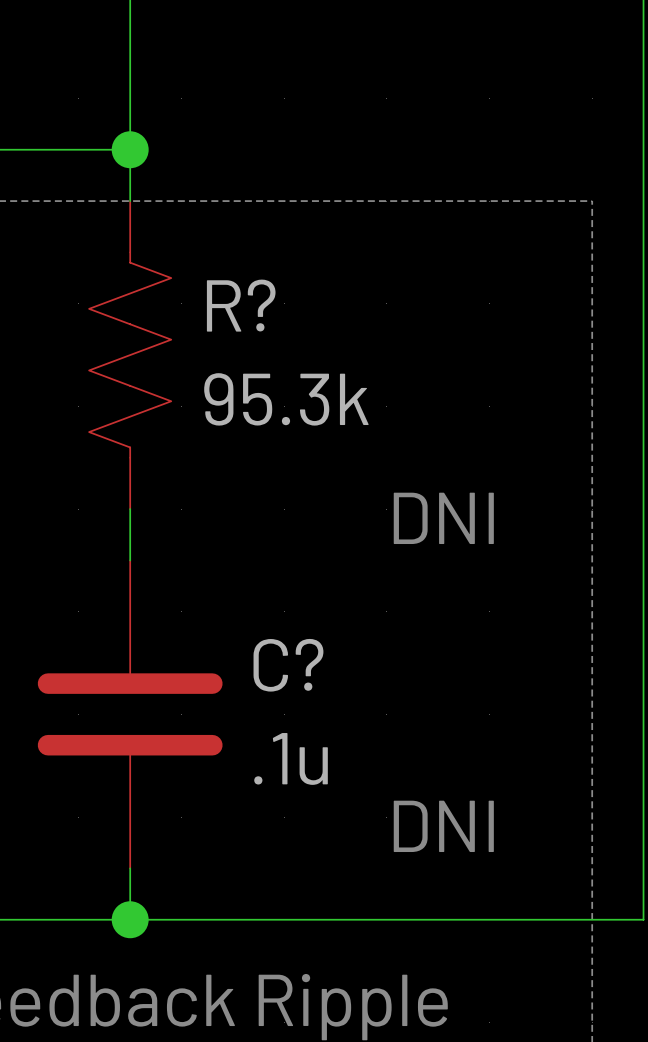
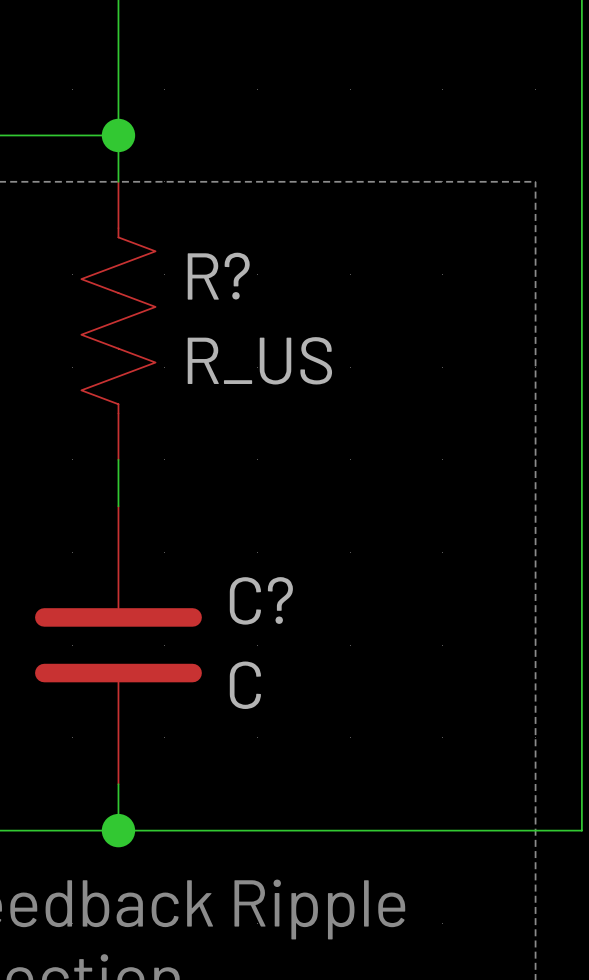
R? value: 95.3k (286, 399) -> R_US (259, 360)
text: DNI (443, 518) -> none
C? value: .1u (291, 758) -> C (245, 685)
text: DNI (443, 826) -> none

